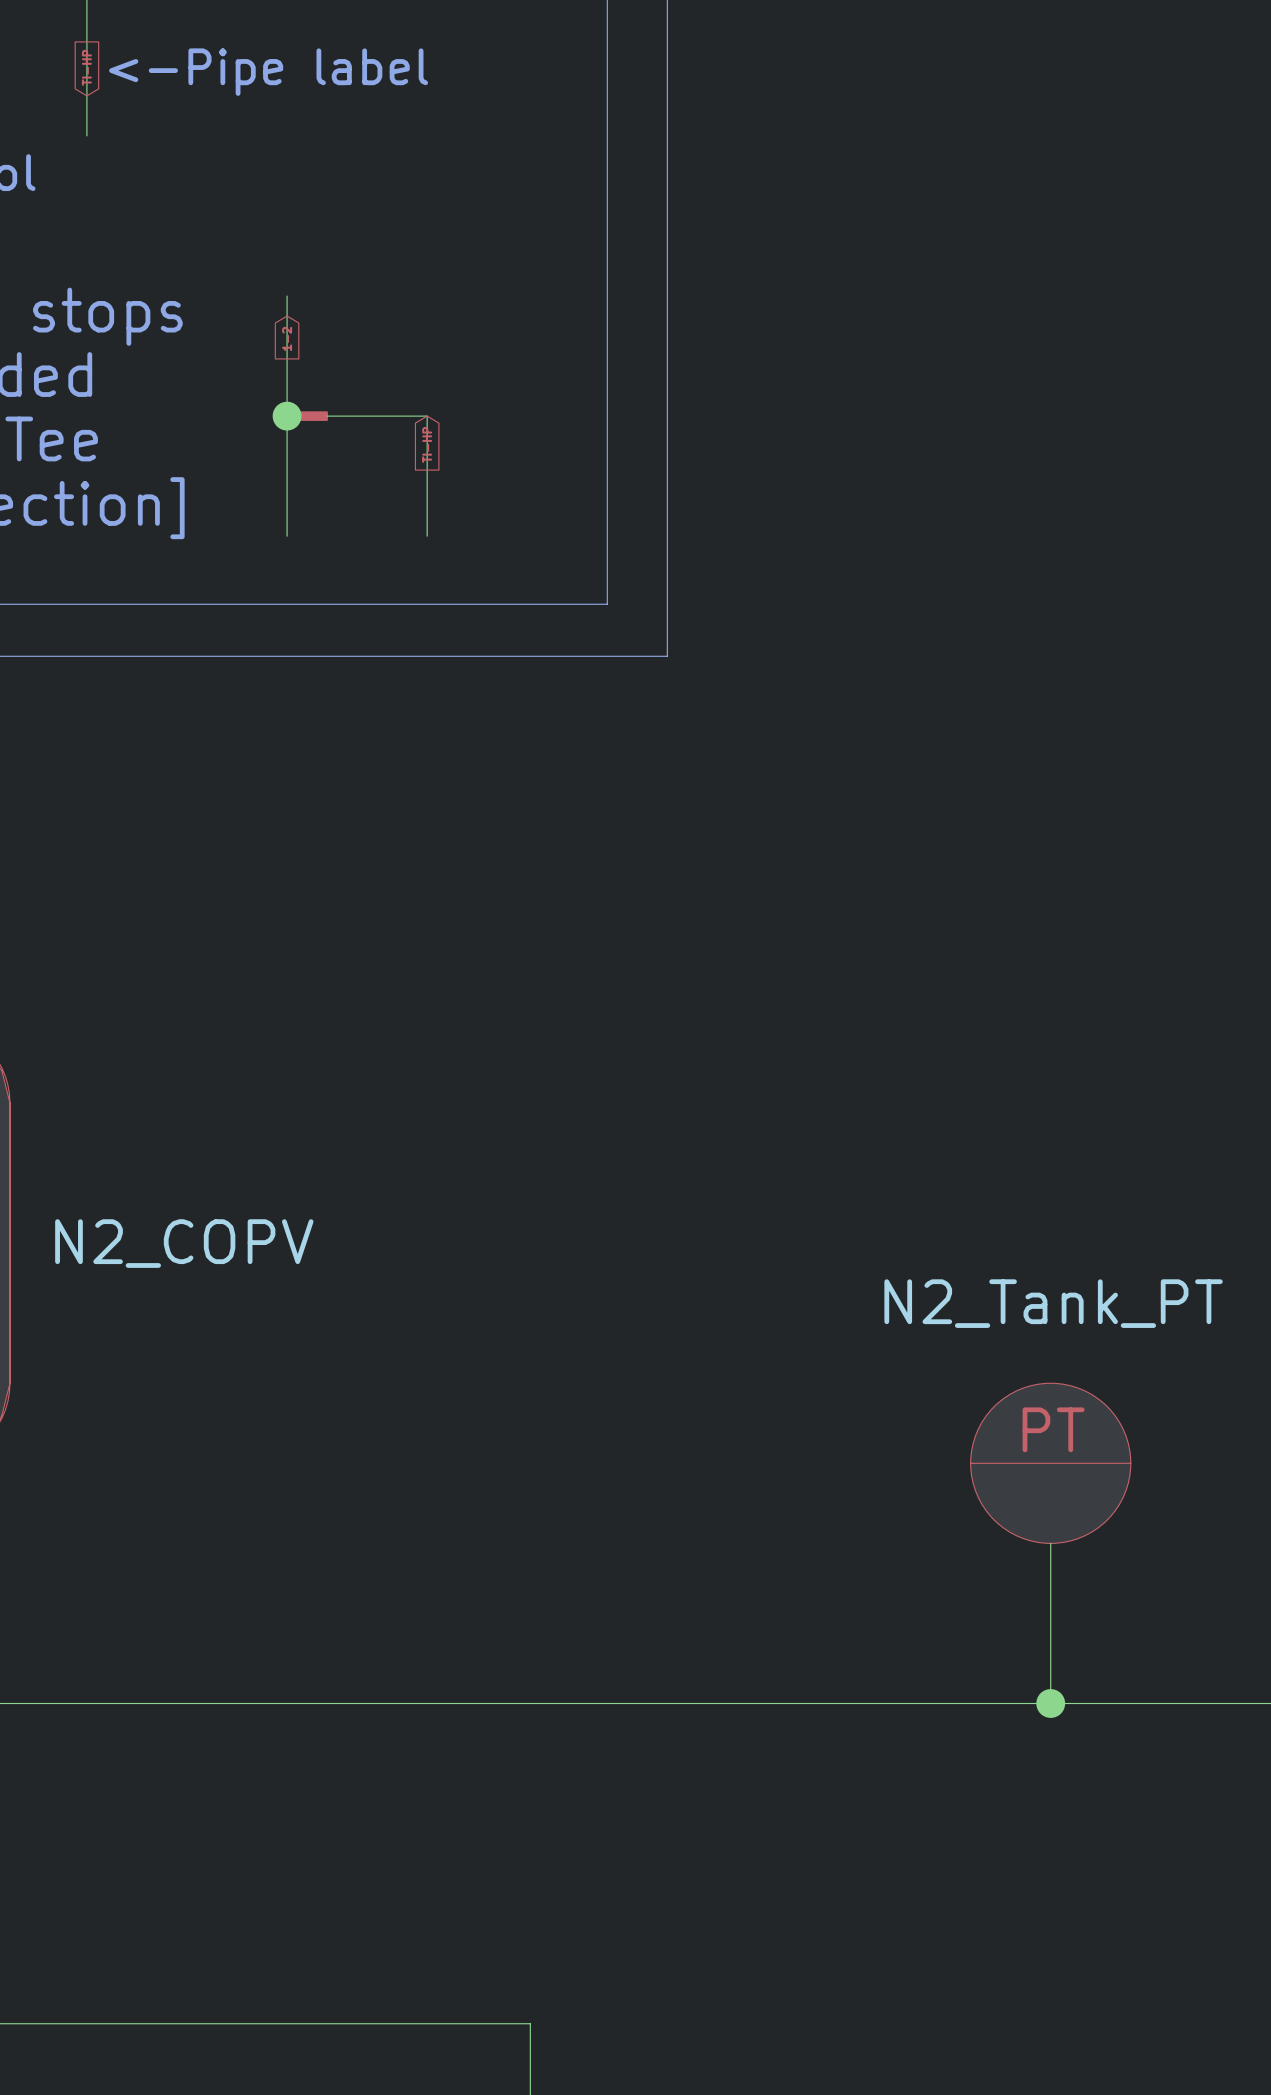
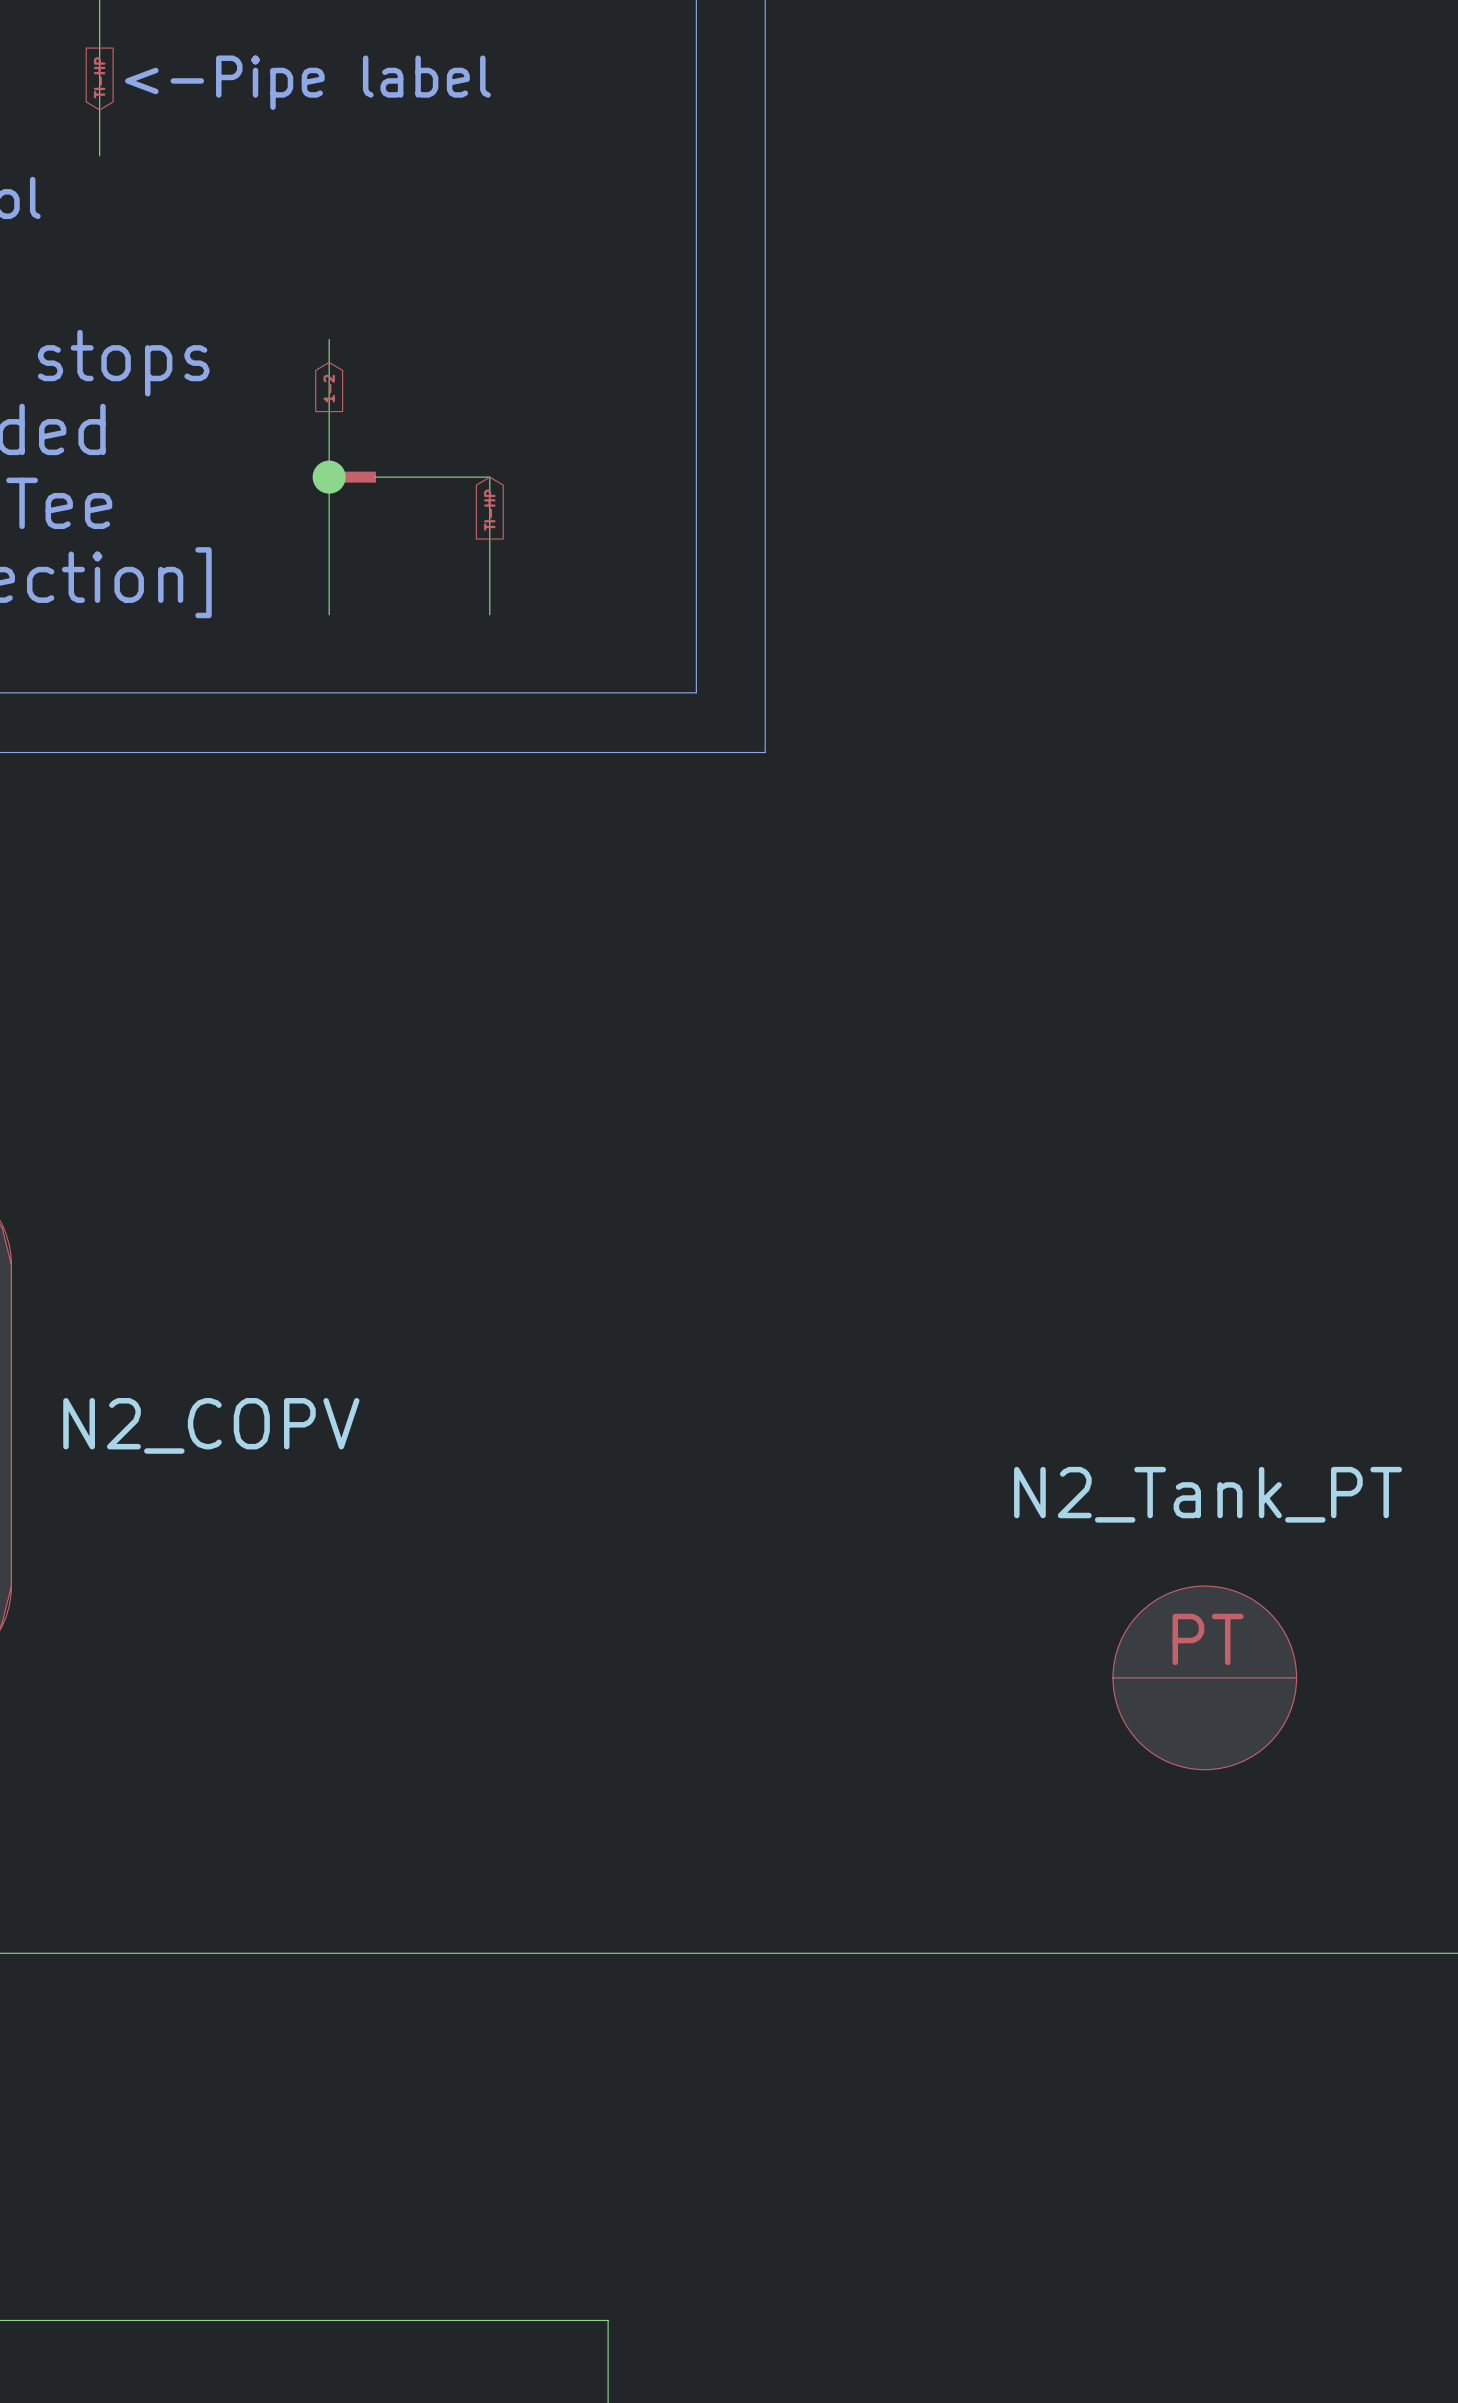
wire: (1050, 1543) (1050, 1703) -> none
junction: (1050, 1703) -> none

